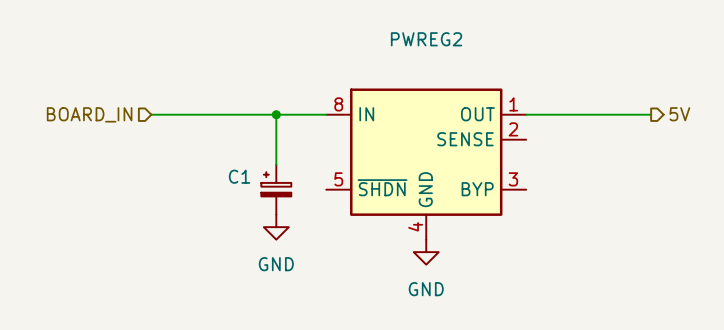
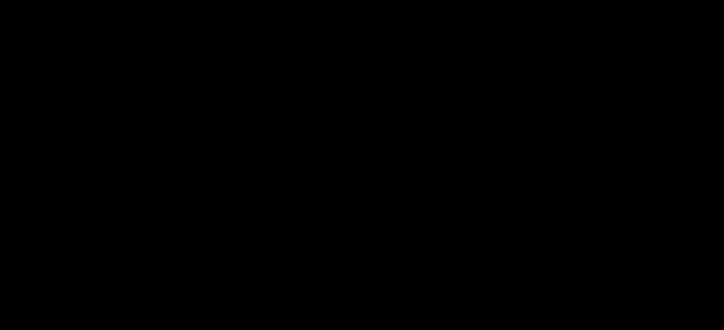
hierarchical label: BOARD_IN (89, 114) -> none
wire: (151, 114) (326, 114) -> none
wire: (276, 114) (276, 164) -> none
junction: (276, 114) -> none
wire: (526, 114) (651, 114) -> none
hierarchical label: 5V (679, 114) -> none
PWREG2: (426, 164) -> none
C1: (276, 189) -> none
power symbol: GND (276, 227) -> none
power symbol: GND (426, 252) -> none

